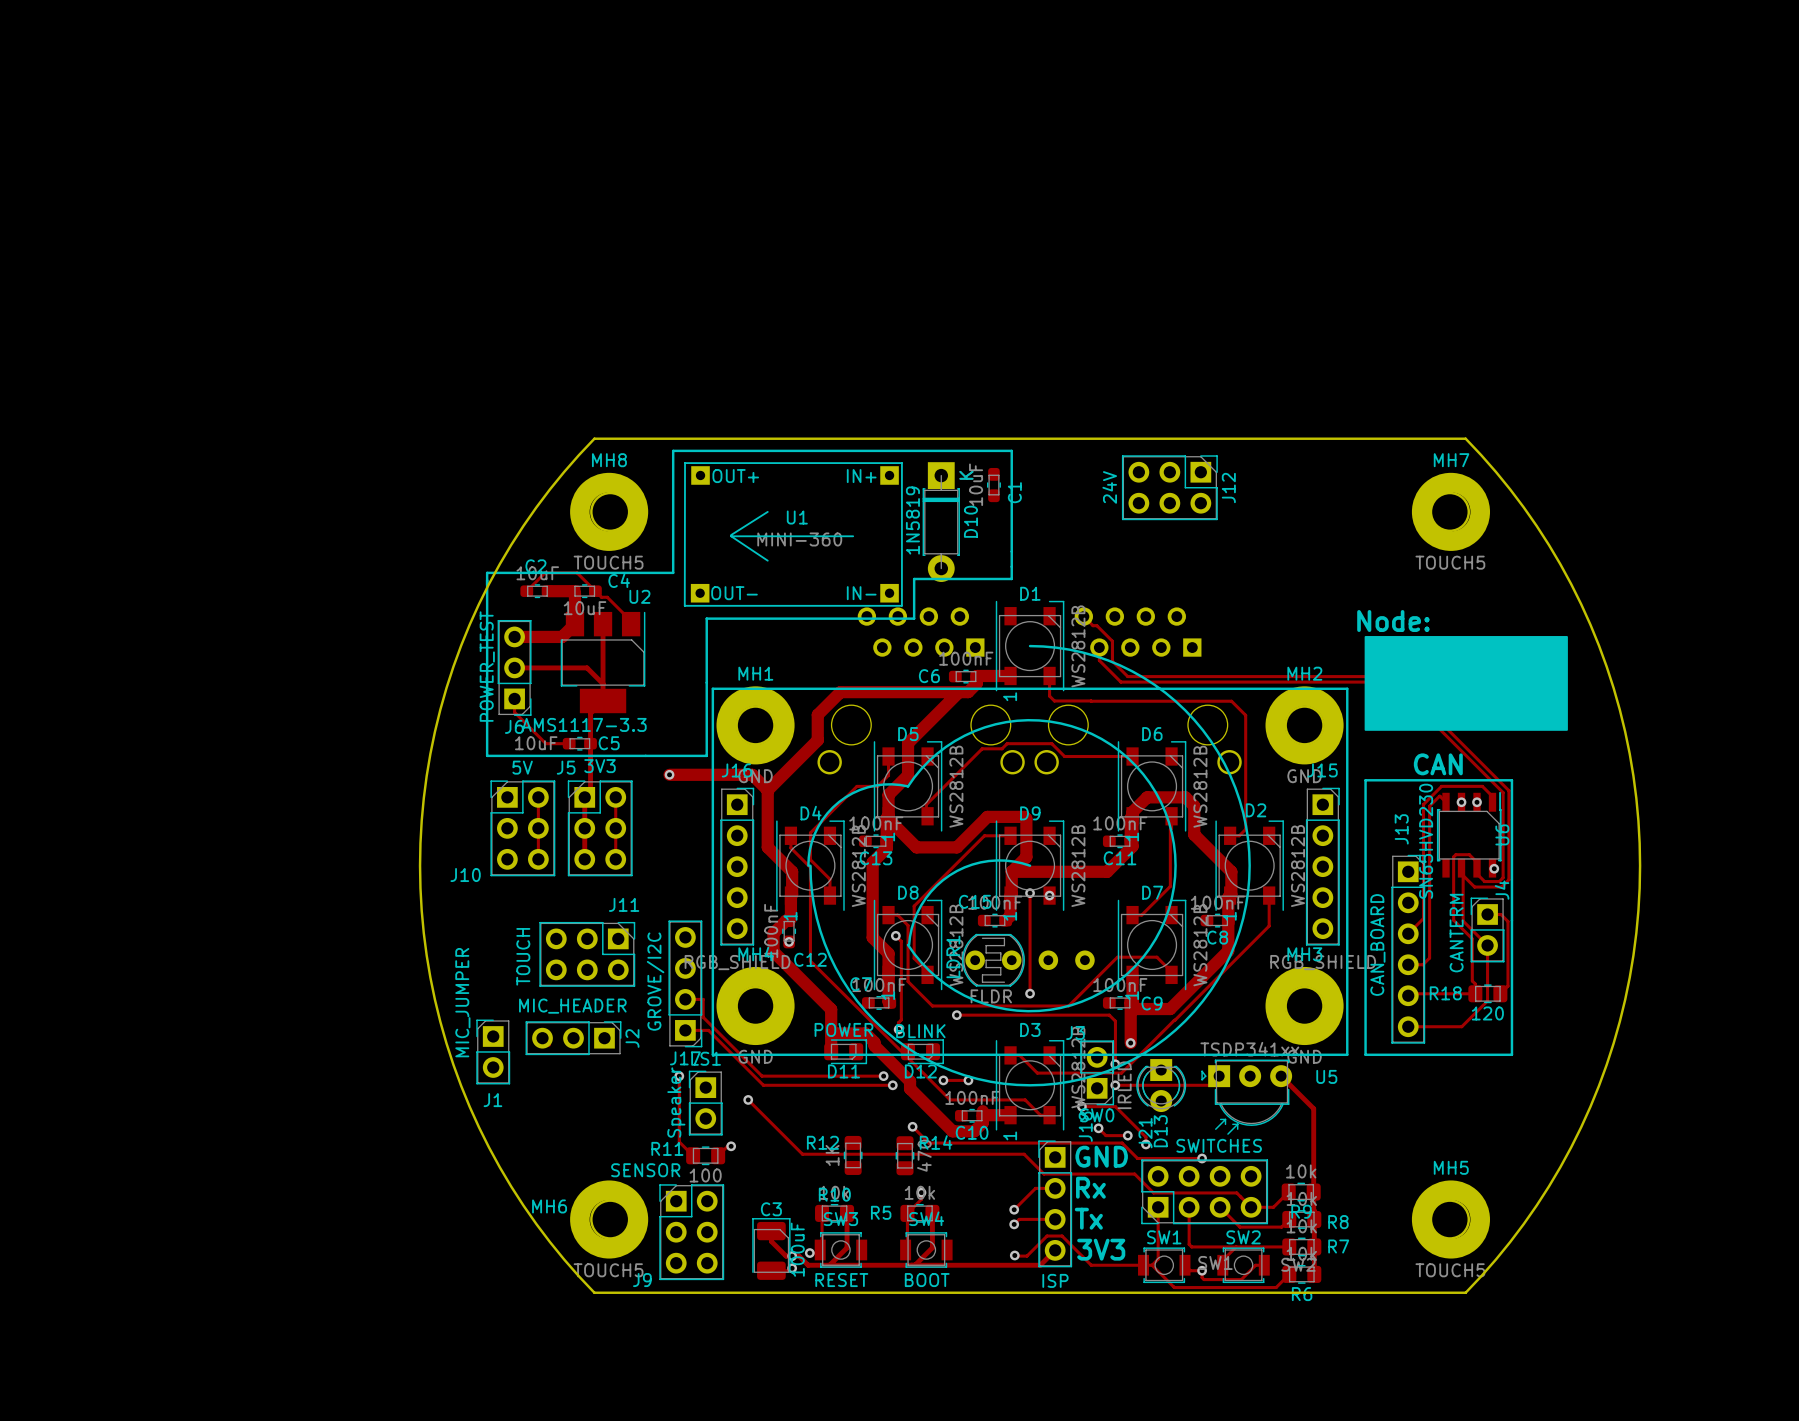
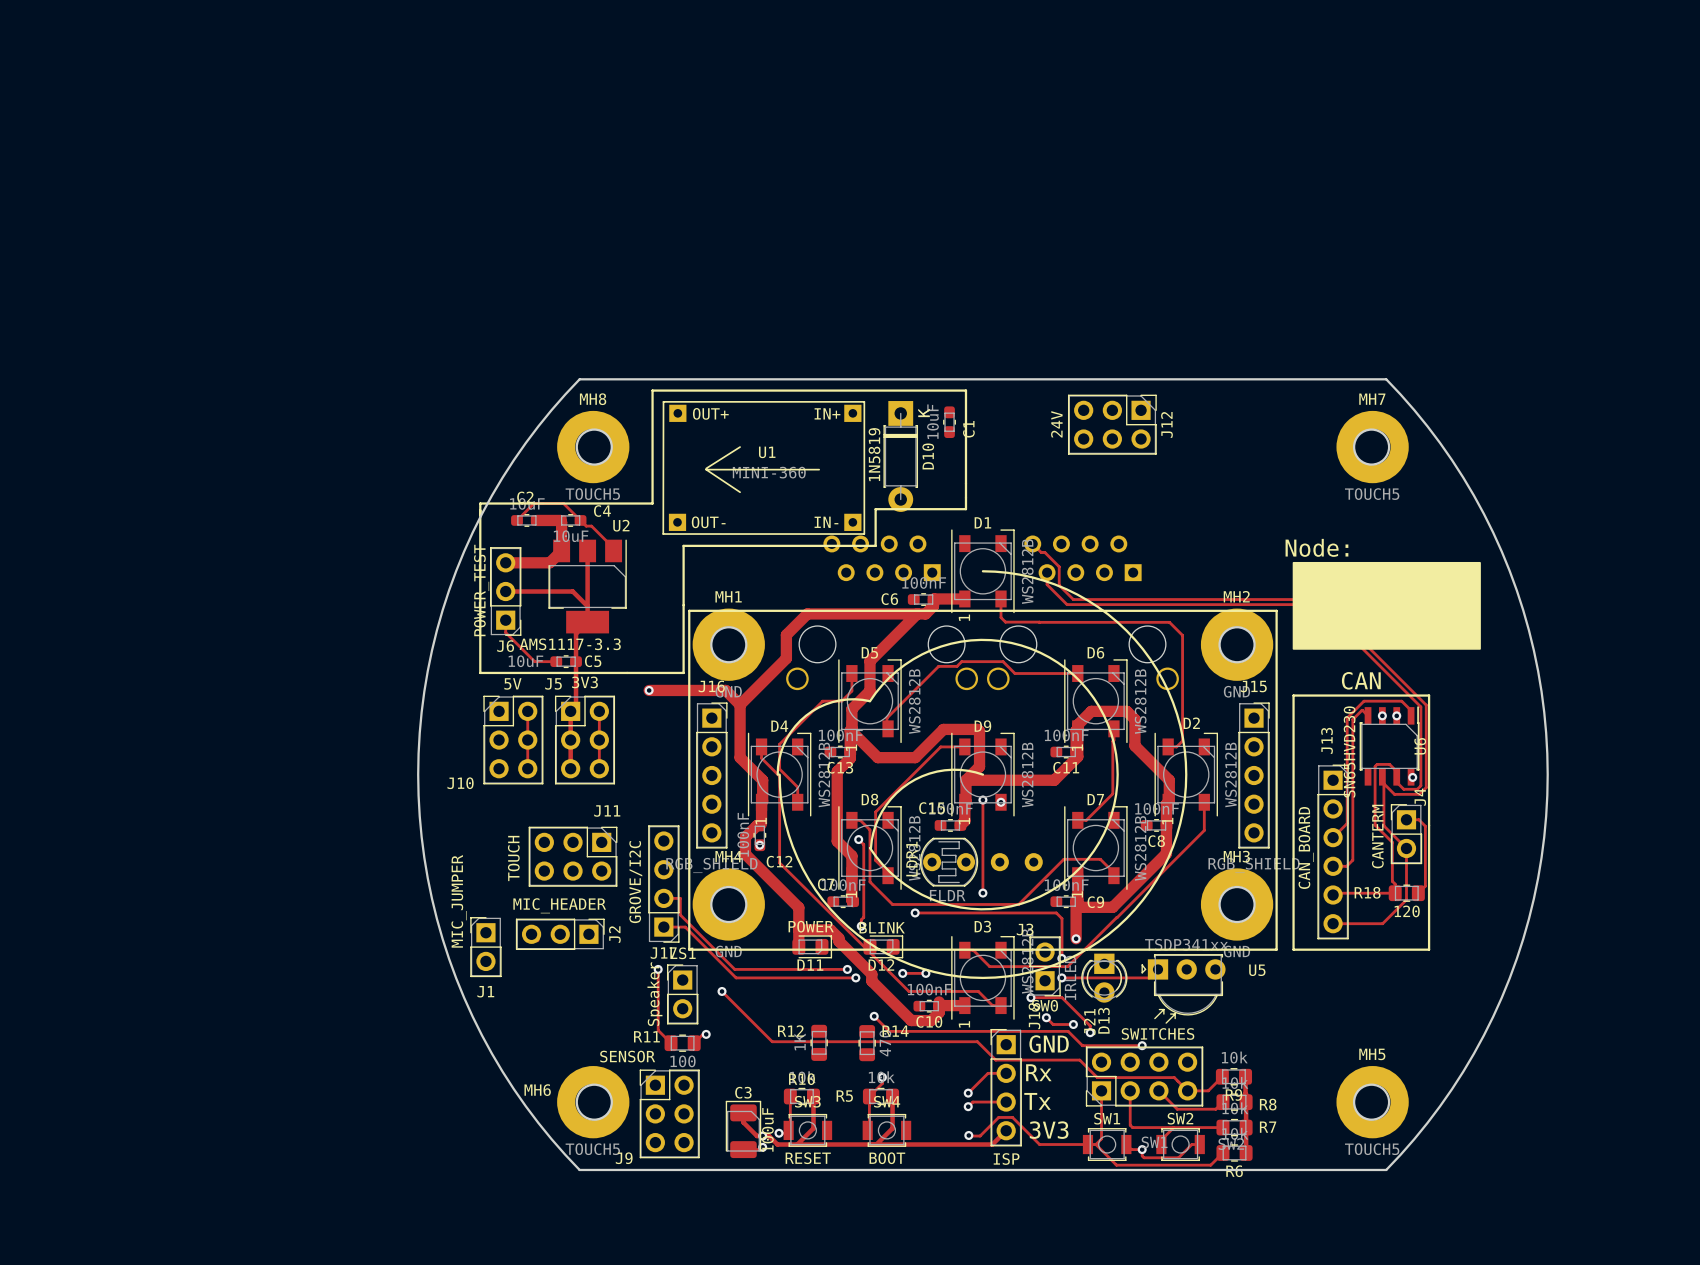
track: (1281, 1076) (1313, 1108) (1313, 1192) -> none

